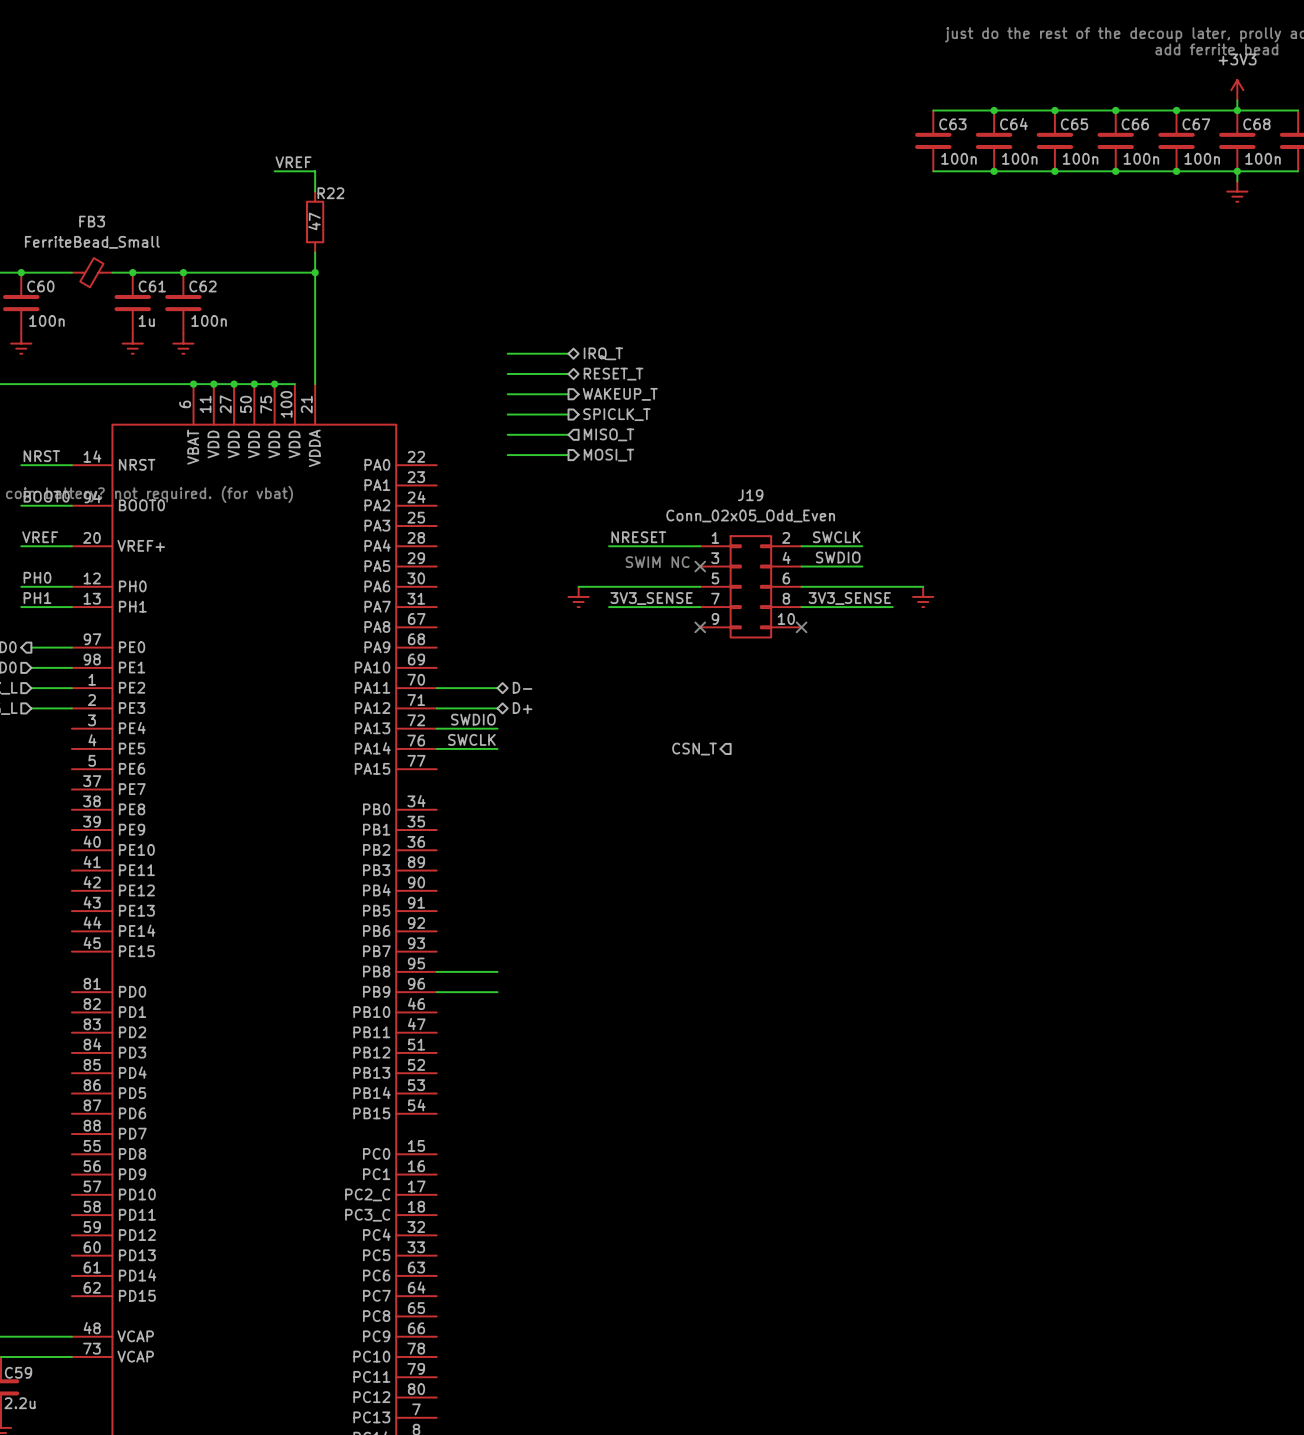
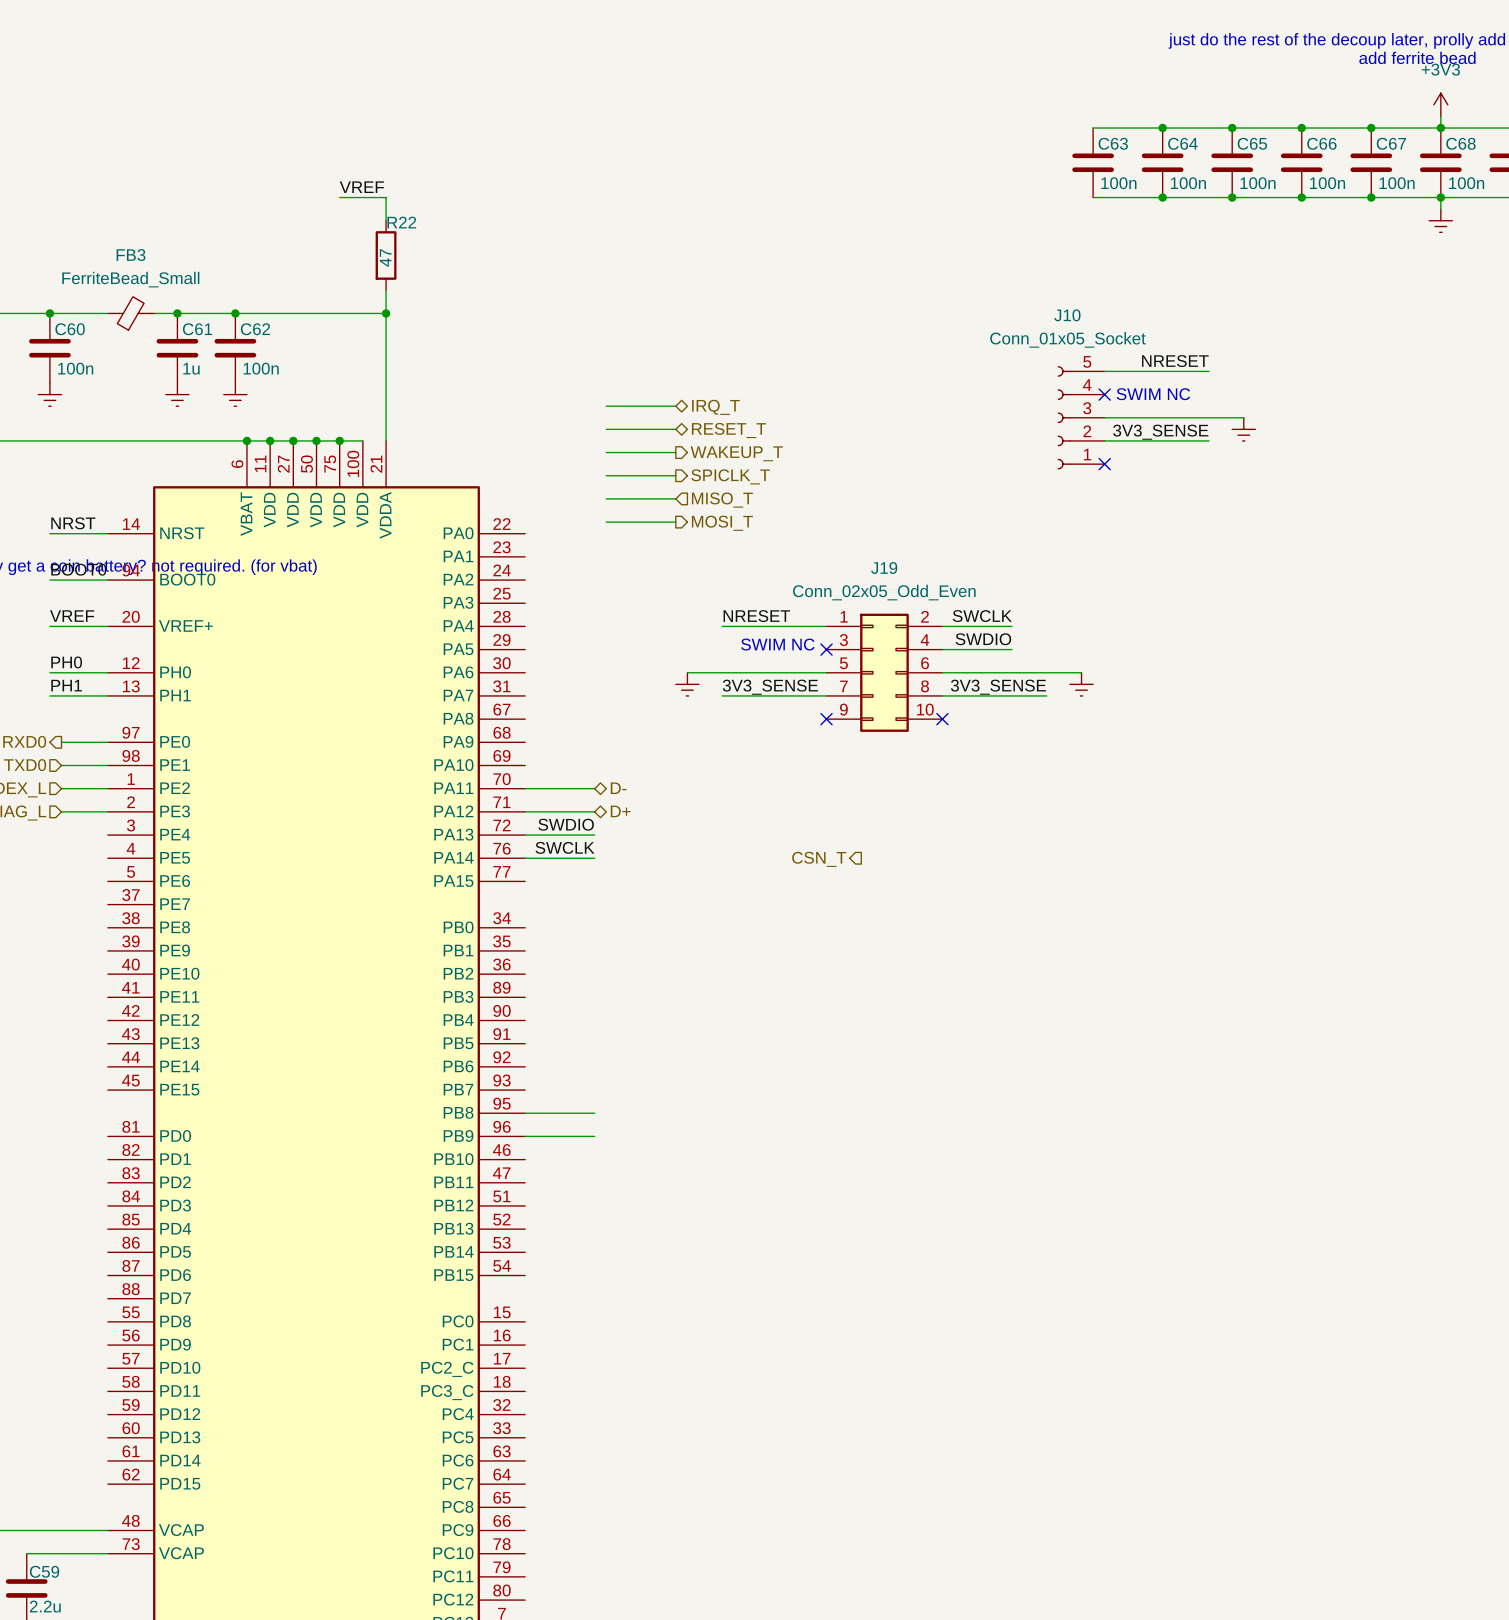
label: none -> NRESET (1175, 361)
wire: none -> (1104, 371) (1209, 371)
no-connect mark: none -> (1104, 394)
text: none -> SWIM NC (1153, 394)
J10: none -> Conn_01x05_Socket (1081, 417)
wire: none -> (1104, 417) (1243, 417)
power symbol: none -> (1243, 429)
label: none -> 3V3_SENSE (1160, 432)
wire: none -> (1104, 440) (1209, 440)
no-connect mark: none -> (1104, 464)

